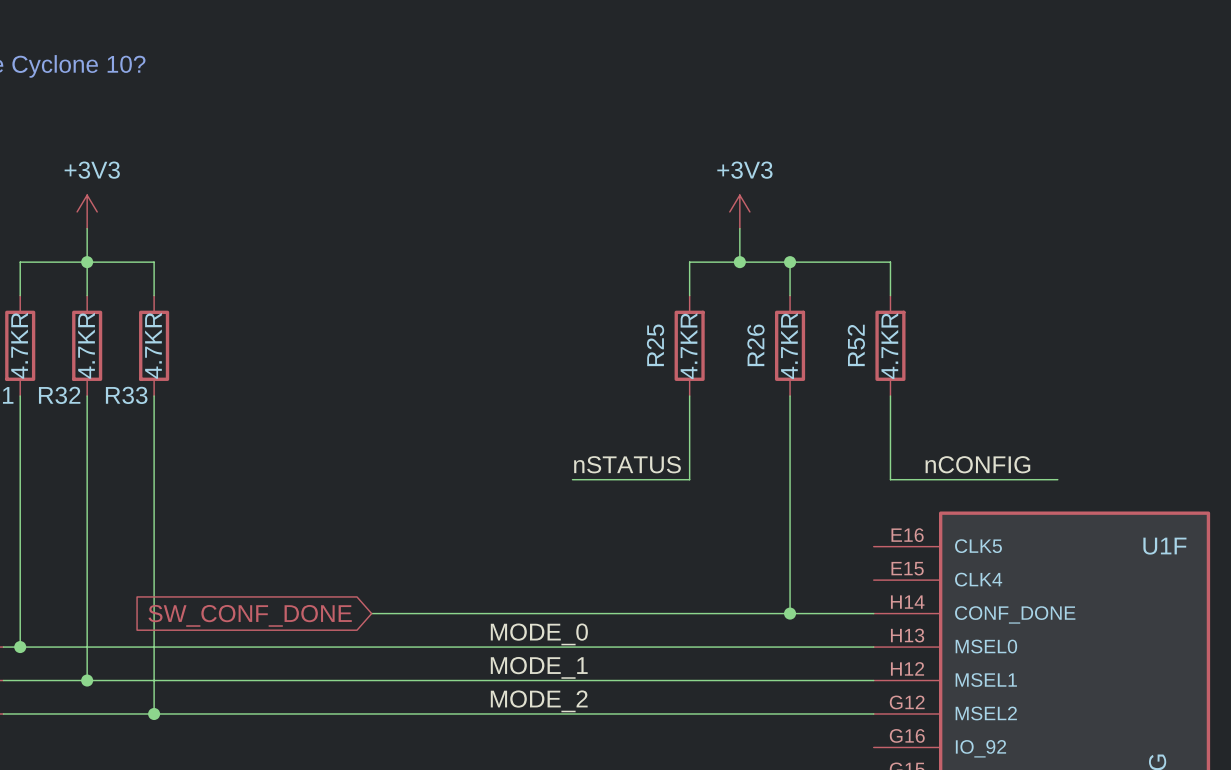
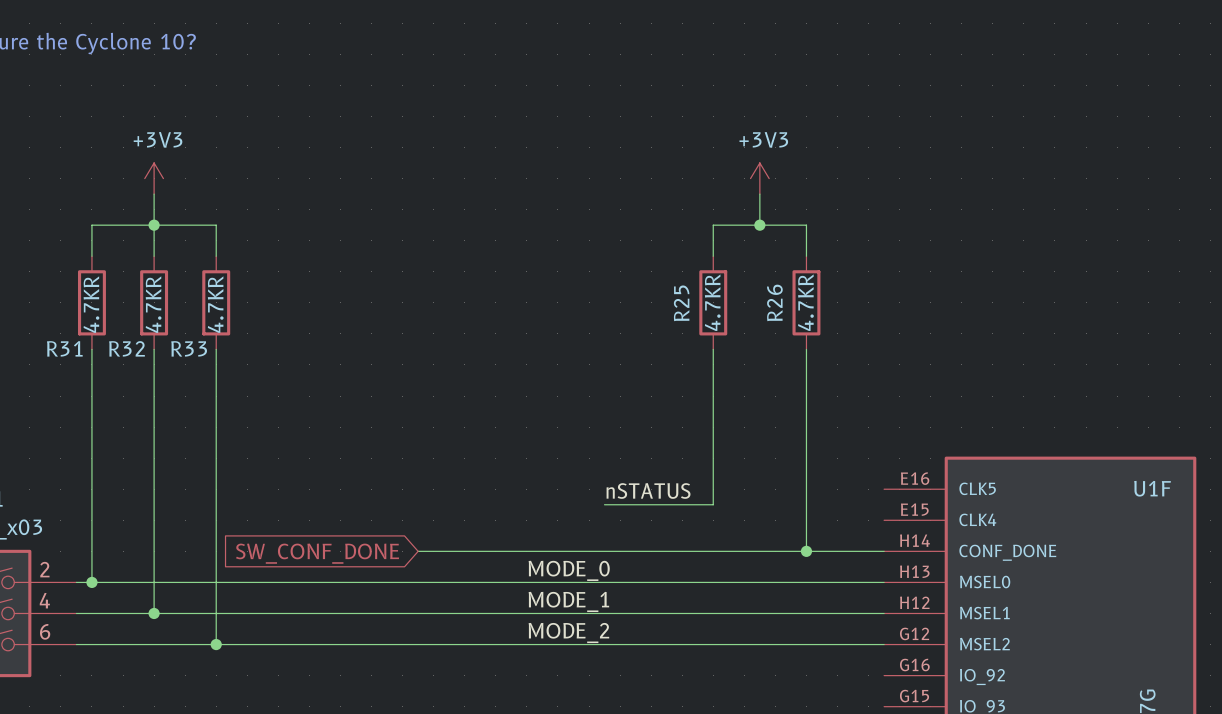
wire: (790, 262) (890, 262) (890, 295) -> none
junction: (790, 262) -> none
R52: 4.7KR (890, 345) -> none
wire: (890, 396) (890, 479) (1057, 479) -> none
label position: nSTATUS (627, 464) -> nSTATUS (648, 490)
label: nCONFIG (977, 464) -> none
wire: (572, 479) (689, 479) -> (604, 504) (713, 504) (713, 427)

